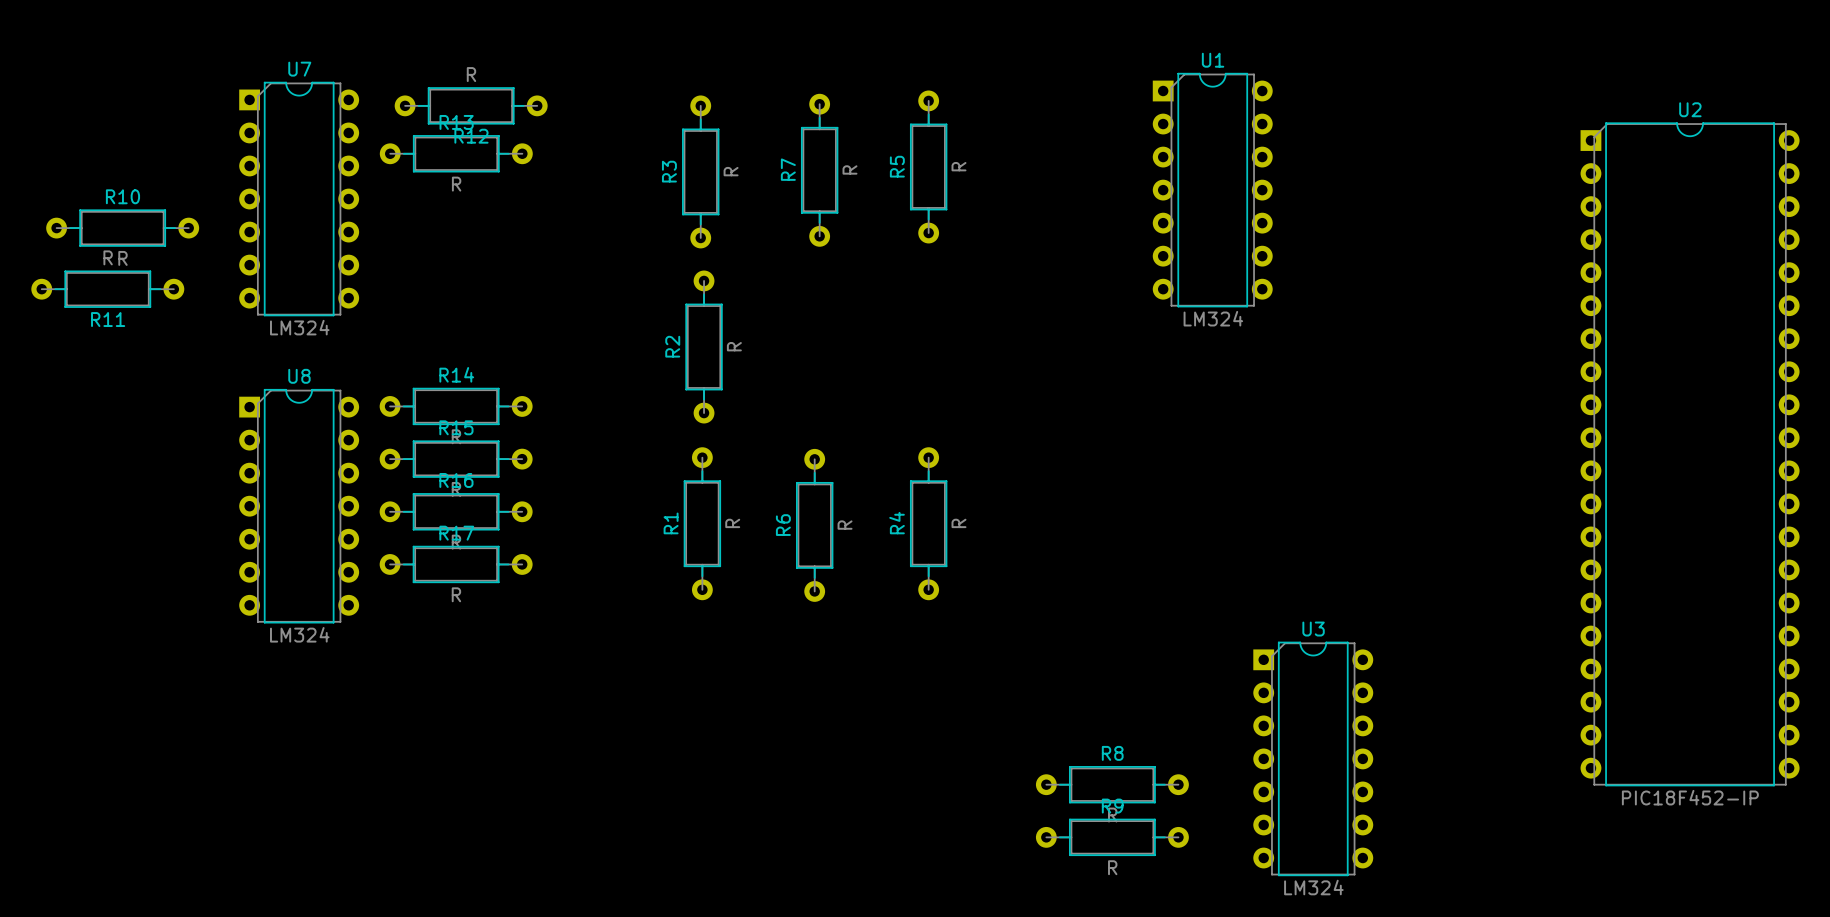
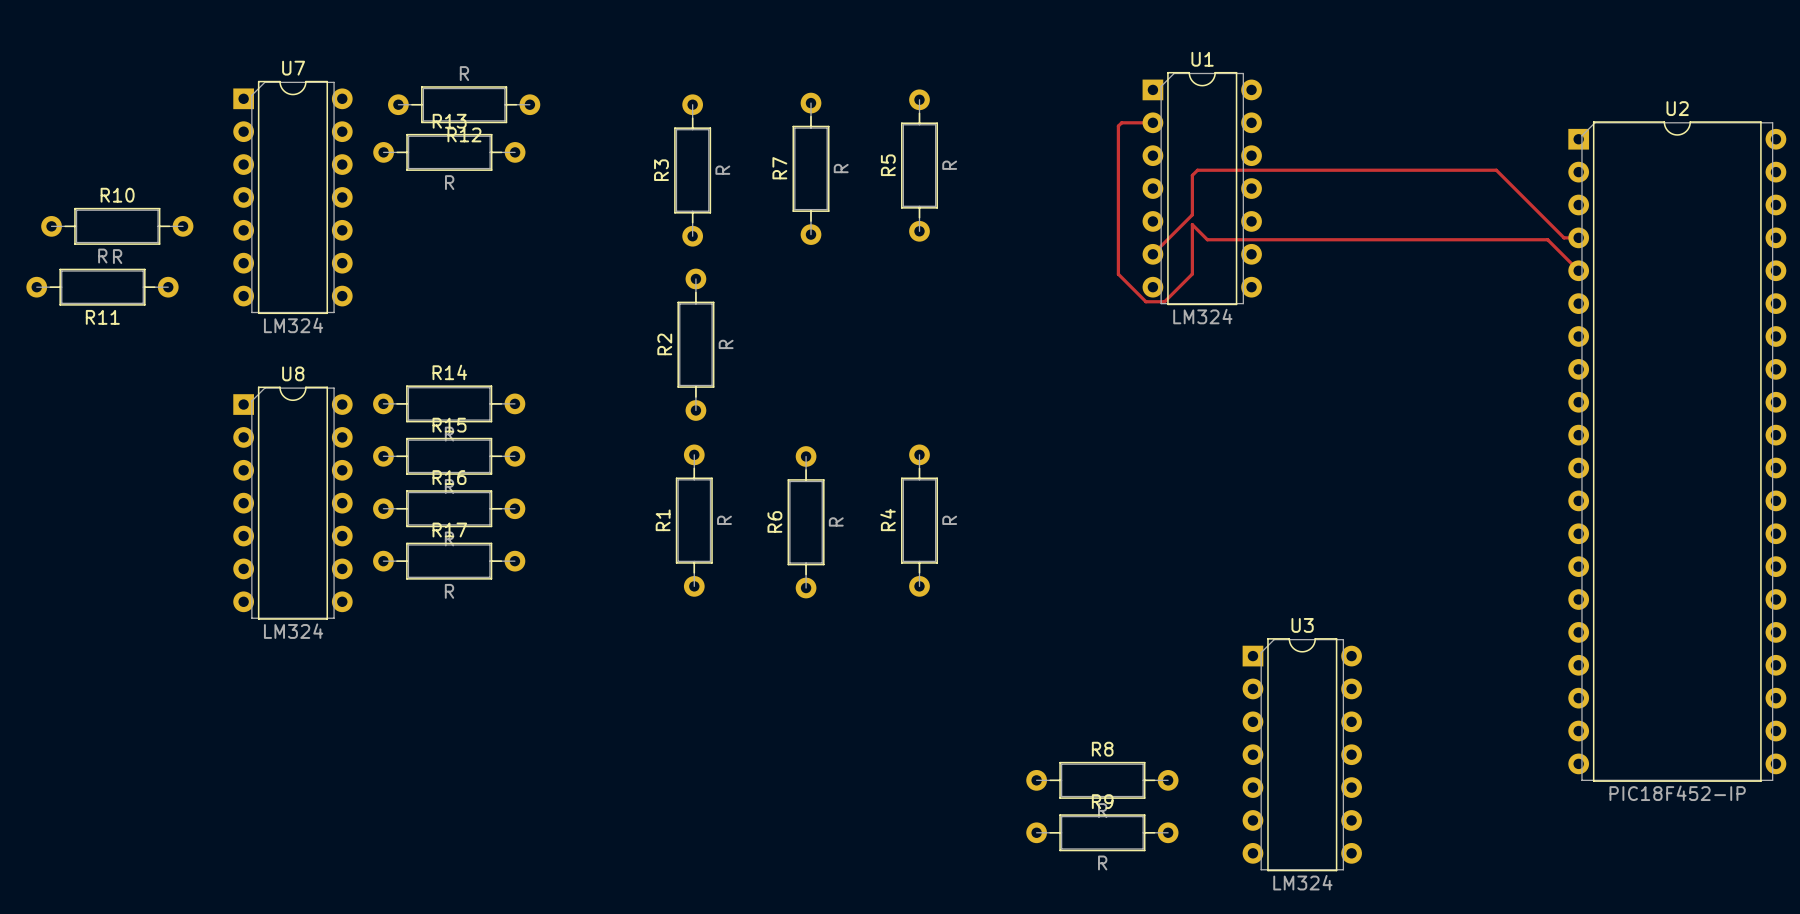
track: none -> (1152, 122) (1121, 122) (1118, 126) (1118, 274) (1145, 301) (1164, 301) (1192, 274) (1192, 224) (1207, 239) (1547, 239) (1578, 270)
track: none -> (1578, 237) (1564, 237) (1496, 170) (1197, 170) (1192, 175) (1192, 214) (1152, 254)

